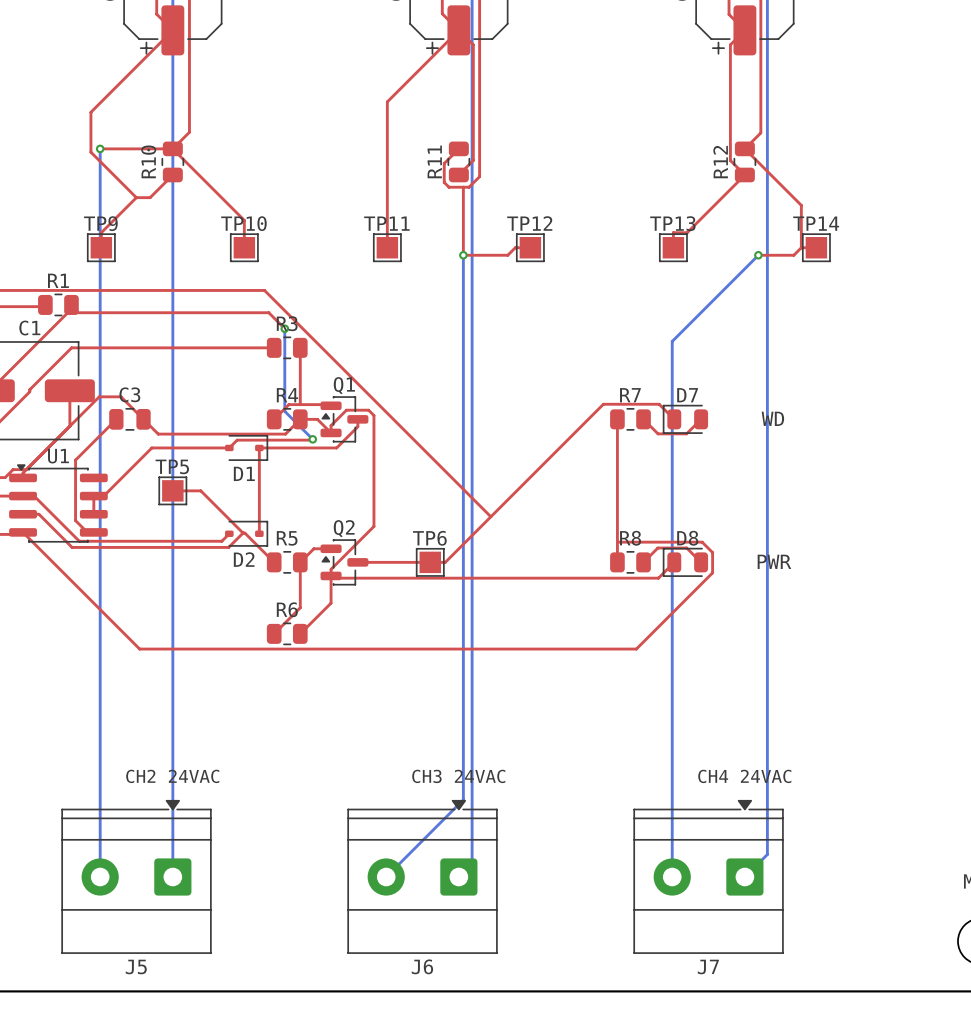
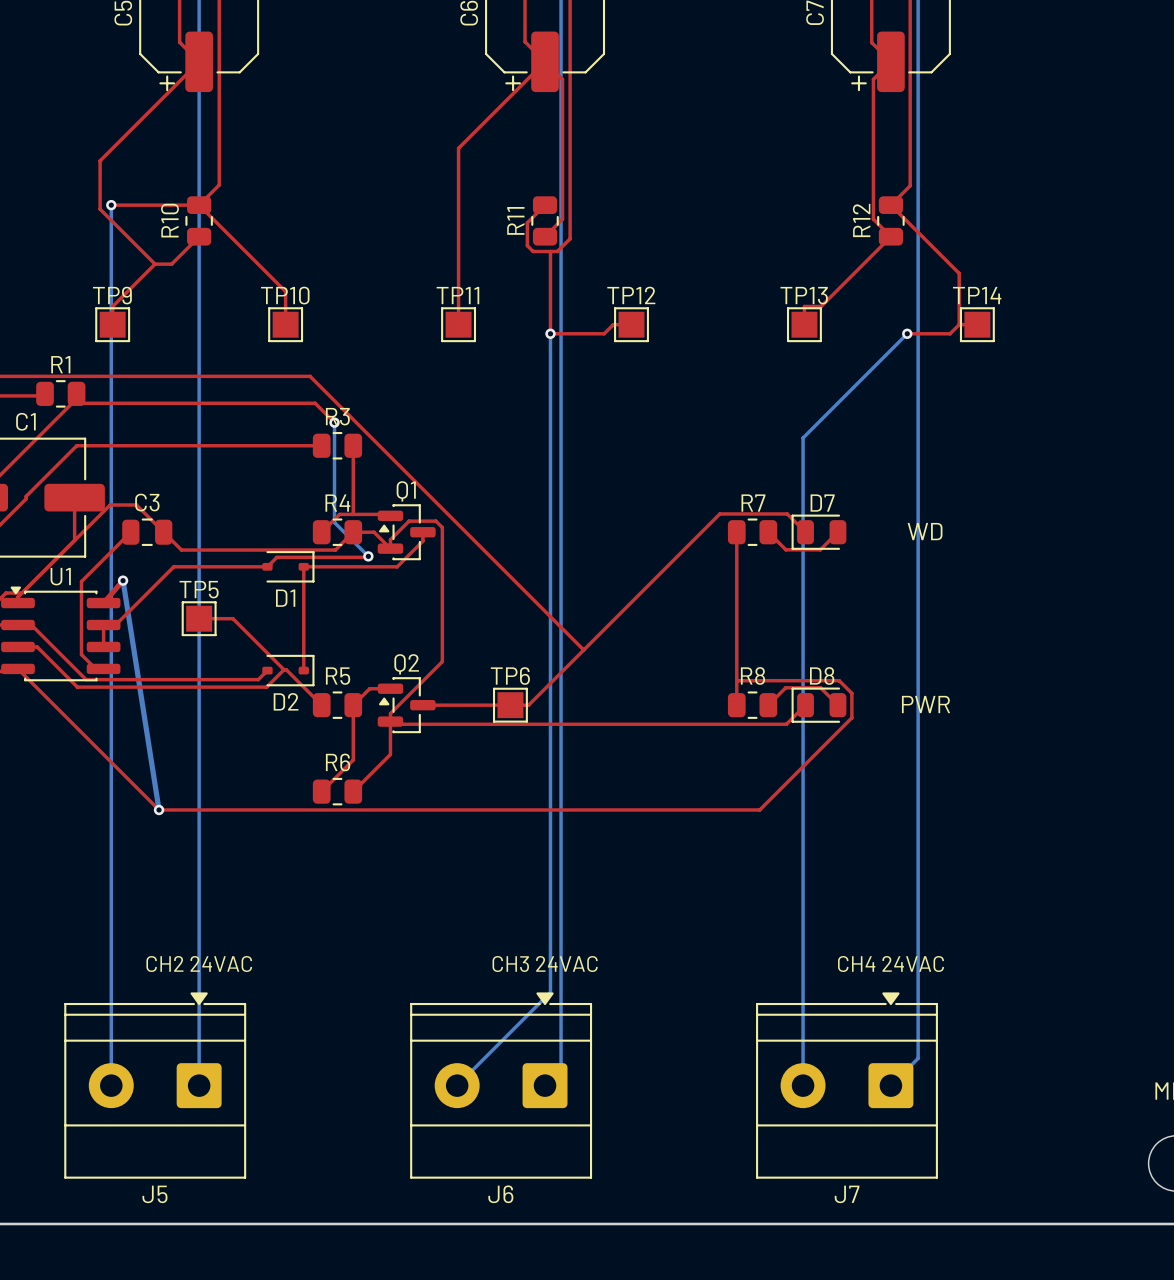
top track: none -> (123, 580) (103, 603)
bottom track: none -> (123, 580) (159, 809)
via: none -> (123, 580)
via: none -> (159, 809)

